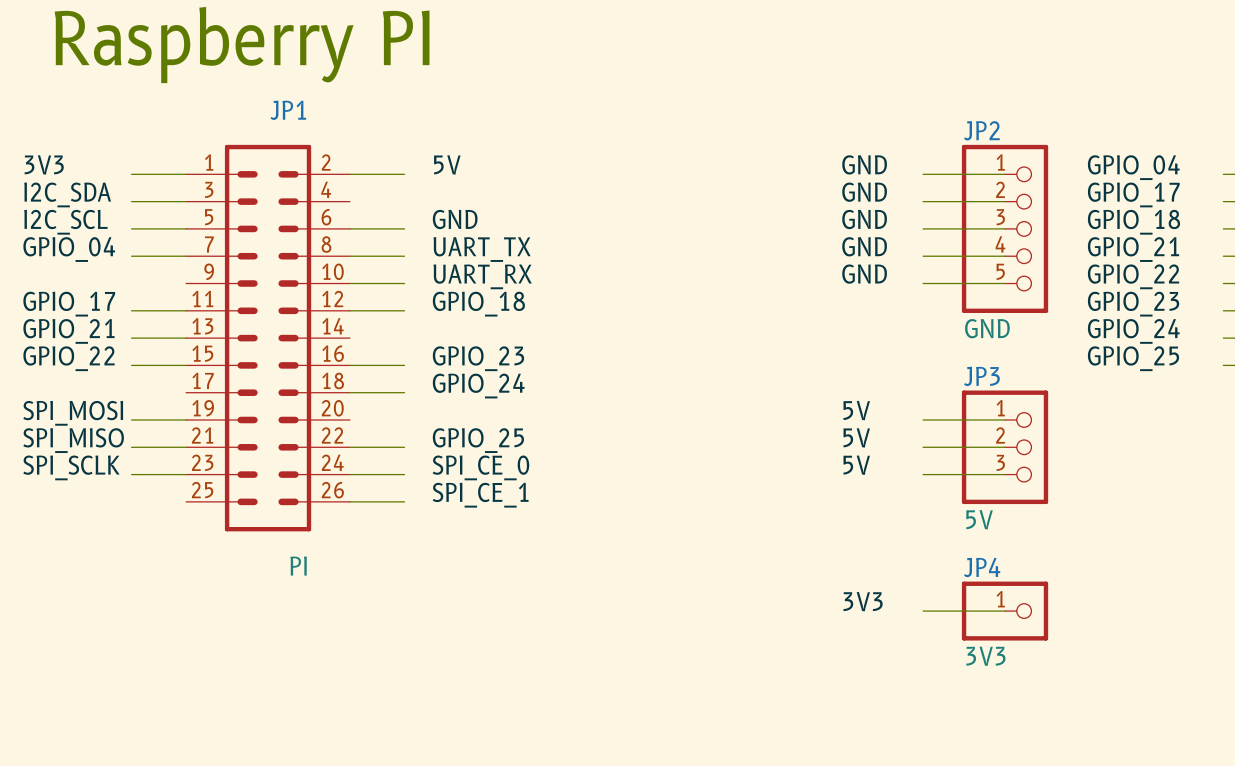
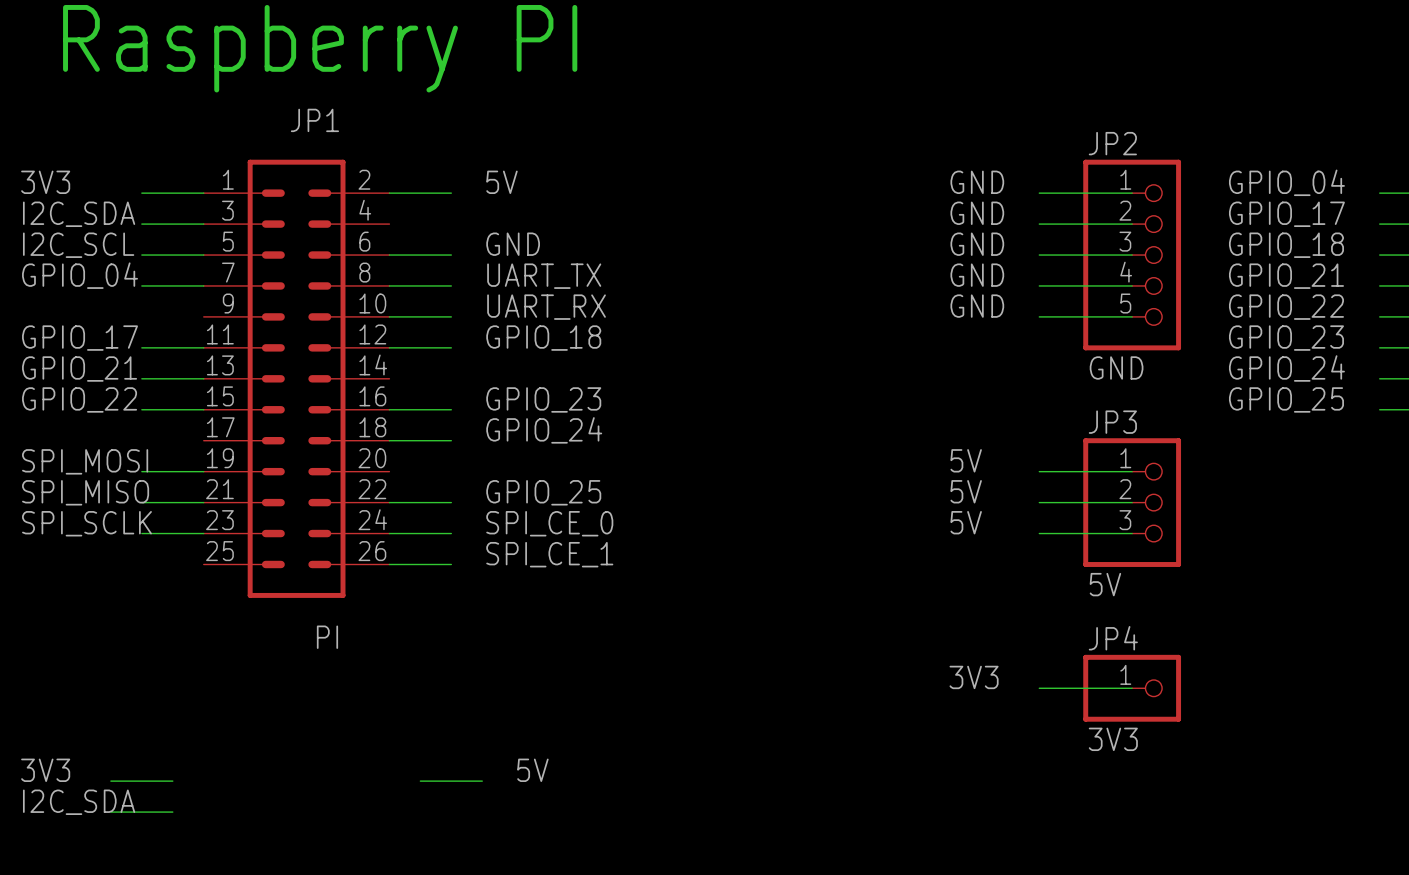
label: none -> 3V3 (45, 770)
label: none -> 5V (532, 770)
wire: none -> (110, 781) (172, 781)
wire: none -> (420, 781) (482, 781)
label: none -> I2C_SDA (79, 802)
wire: none -> (110, 812) (172, 812)

